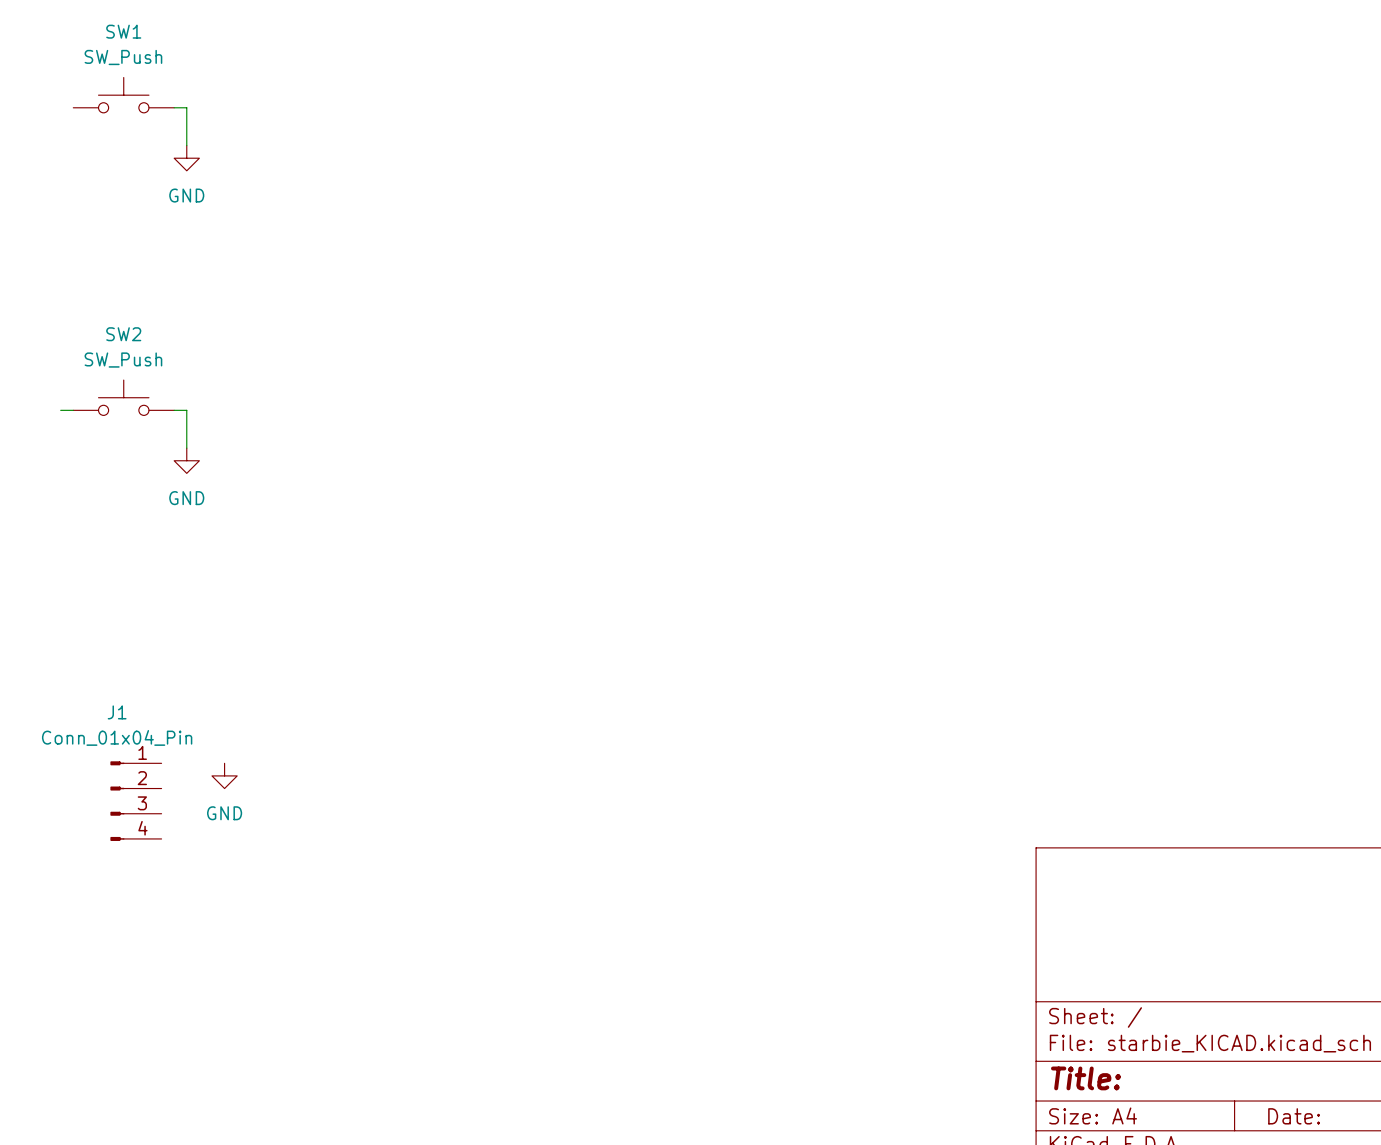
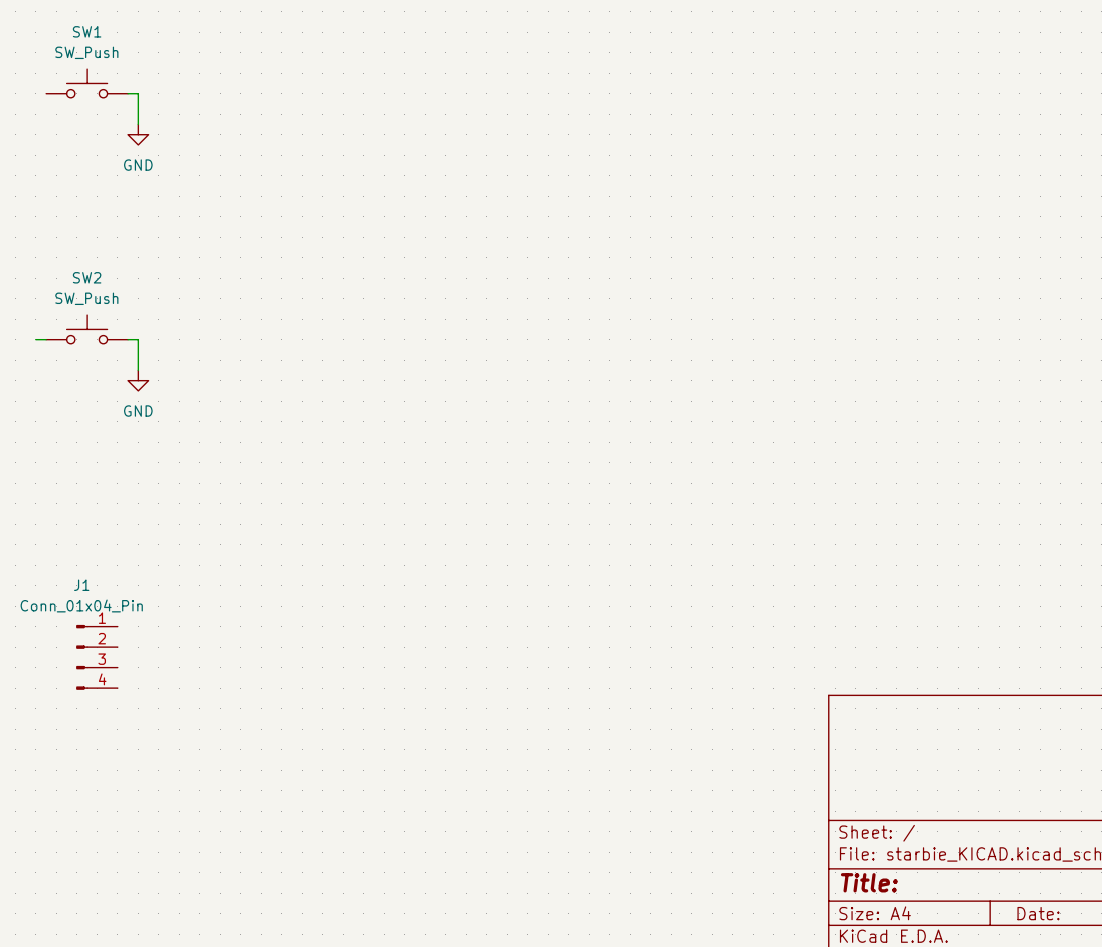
power symbol: GND (224, 775) -> none

